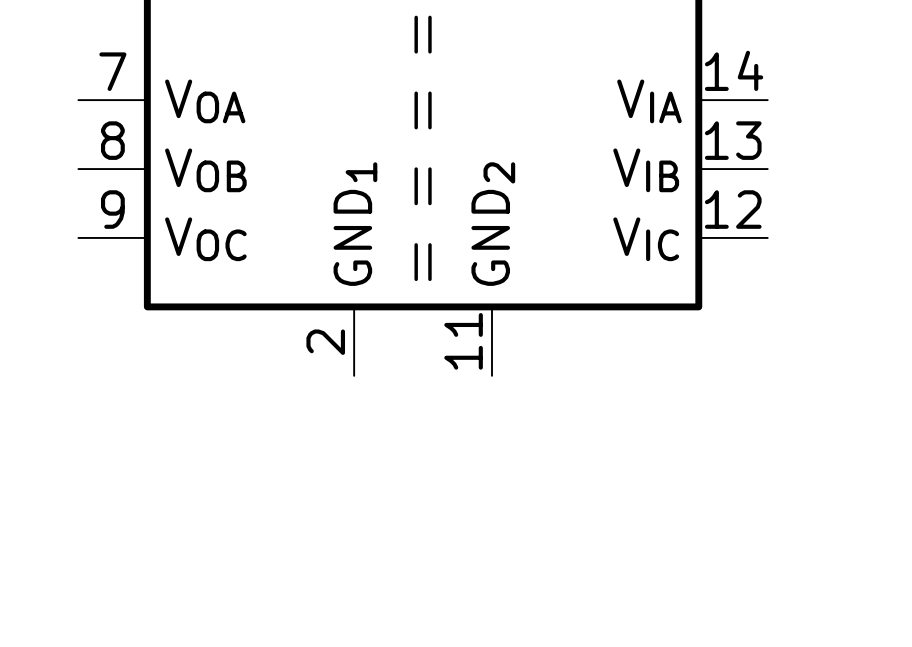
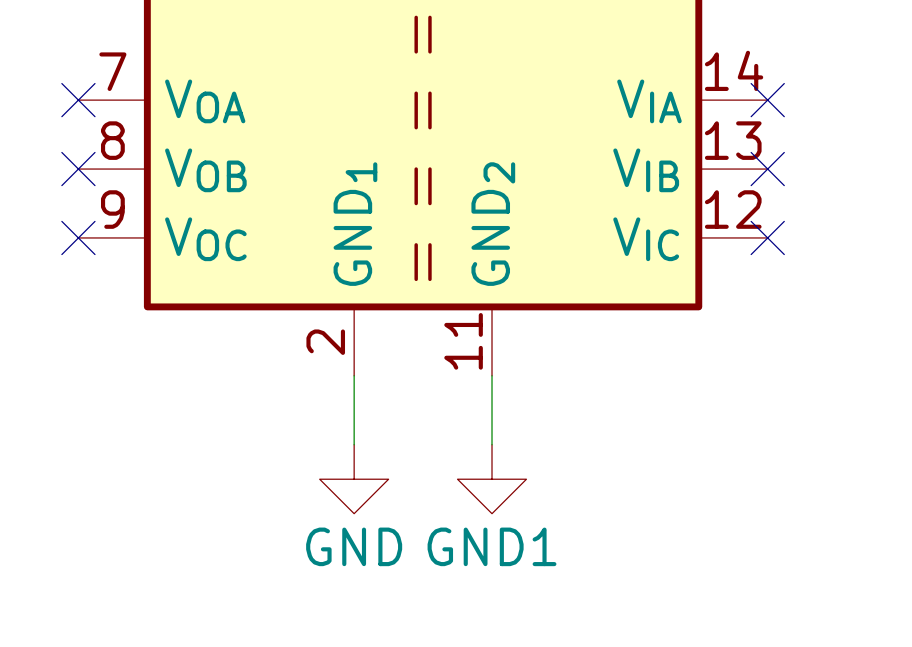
no-connect mark: none -> (78, 100)
no-connect mark: none -> (767, 100)
no-connect mark: none -> (78, 169)
no-connect mark: none -> (767, 169)
no-connect mark: none -> (78, 237)
no-connect mark: none -> (767, 237)
wire: none -> (354, 375) (354, 444)
wire: none -> (492, 375) (492, 444)
power symbol: none -> GND (354, 479)
power symbol: none -> GND1 (492, 479)

